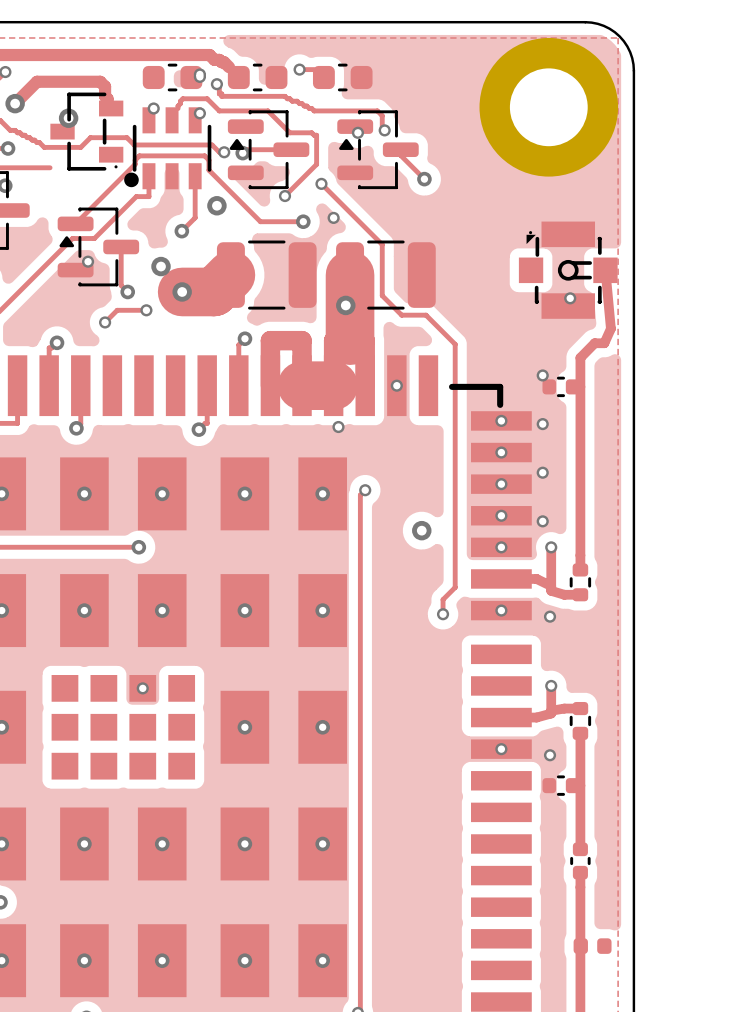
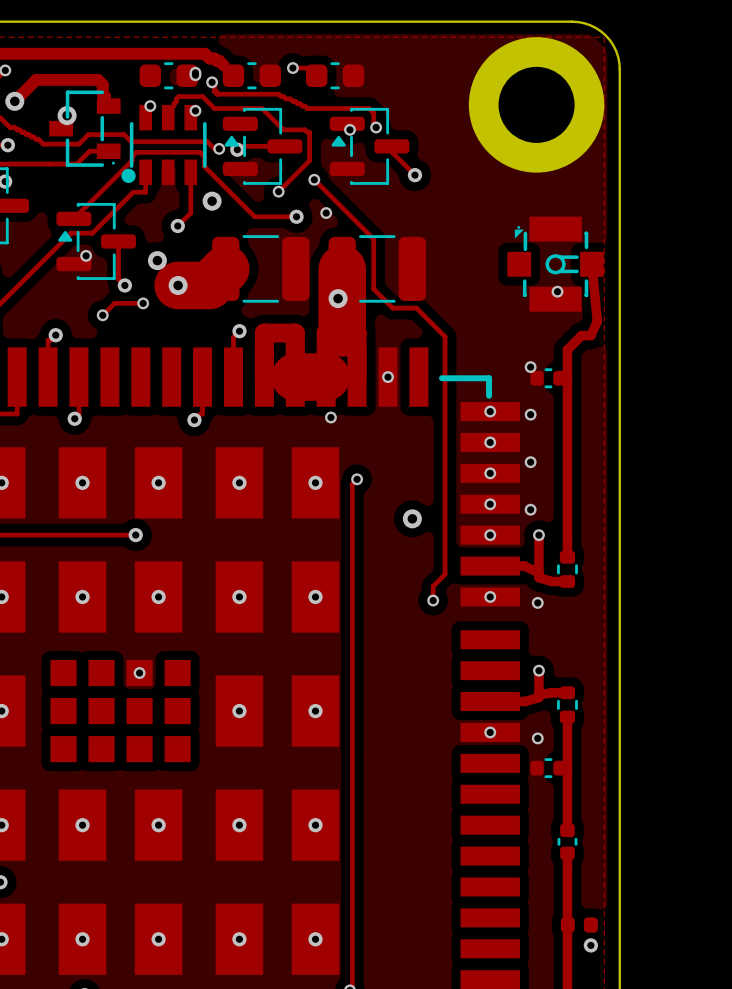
track: none -> (108, 151) (89, 151) (76, 164) (48, 164)
via: none -> (590, 945)

